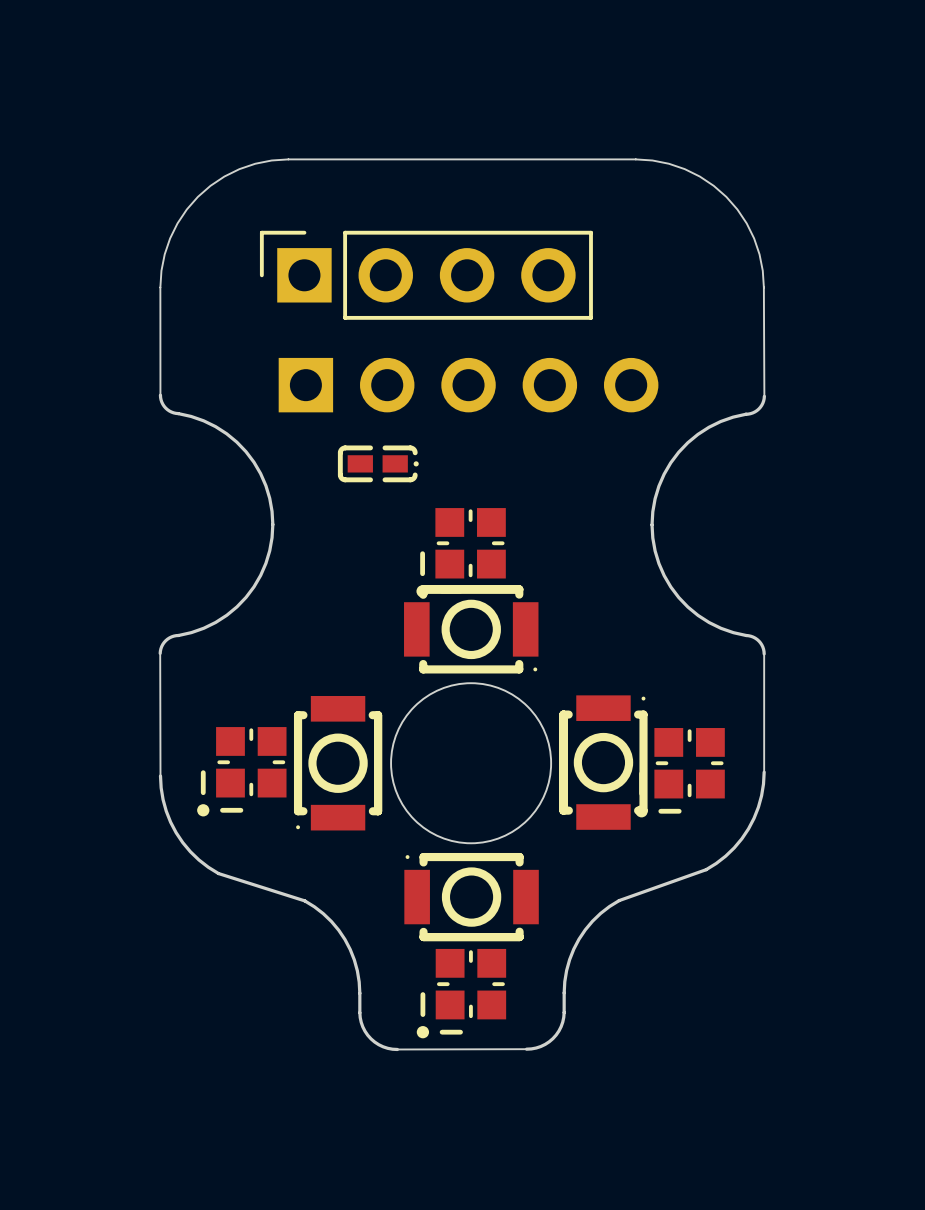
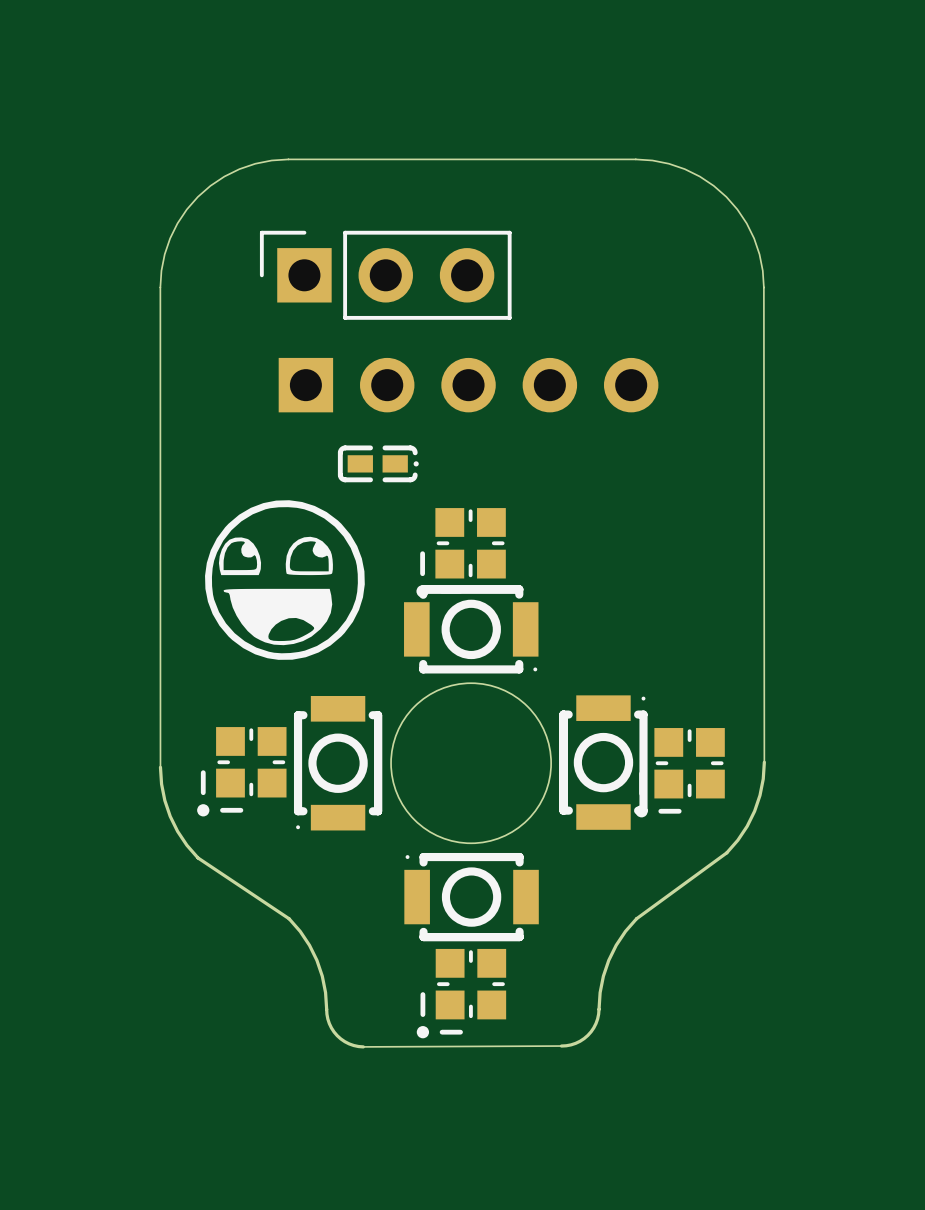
part: none -> (385, 275)
part: (426, 275) -> none
board edge: (160, 287) (161, 402) (171, 412) (191, 416) (215, 426) (236, 442) (246, 451) (260, 473) (265, 485) (272, 511) (272, 524) (272, 537) (265, 563) (254, 586) (246, 597) (236, 606) (215, 622) (191, 632) (171, 636) (161, 646) (160, 776) (166, 811) (182, 842) (208, 867) (218, 873) (304, 900) (331, 921) (344, 939) (354, 959) (359, 981) (360, 1017) (365, 1031) (378, 1044) (397, 1049) (526, 1049) (545, 1044) (556, 1034) (561, 1026) (563, 1017) (564, 981) (569, 959) (579, 939) (592, 921) (619, 900) (706, 869) (716, 863) (741, 838) (754, 818) (761, 795) (764, 772) (762, 647) (753, 637) (733, 632) (709, 622) (698, 615) (678, 597) (670, 587) (658, 563) (655, 550) (652, 524) (652, 511) (658, 486) (664, 474) (678, 452) (687, 442) (708, 427) (733, 417) (752, 412) (762, 403) (763, 287) -> (160, 287) (160, 767) (164, 800) (177, 831) (197, 857) (289, 918) (300, 931) (309, 945) (322, 976) (326, 1014) (331, 1027) (344, 1041) (363, 1046) (561, 1046) (580, 1041) (587, 1035) (596, 1023) (603, 976) (616, 945) (625, 931) (636, 918) (726, 852) (747, 826) (759, 795) (764, 762) (763, 287)
drawing: none -> [205, 500, 365, 660]

